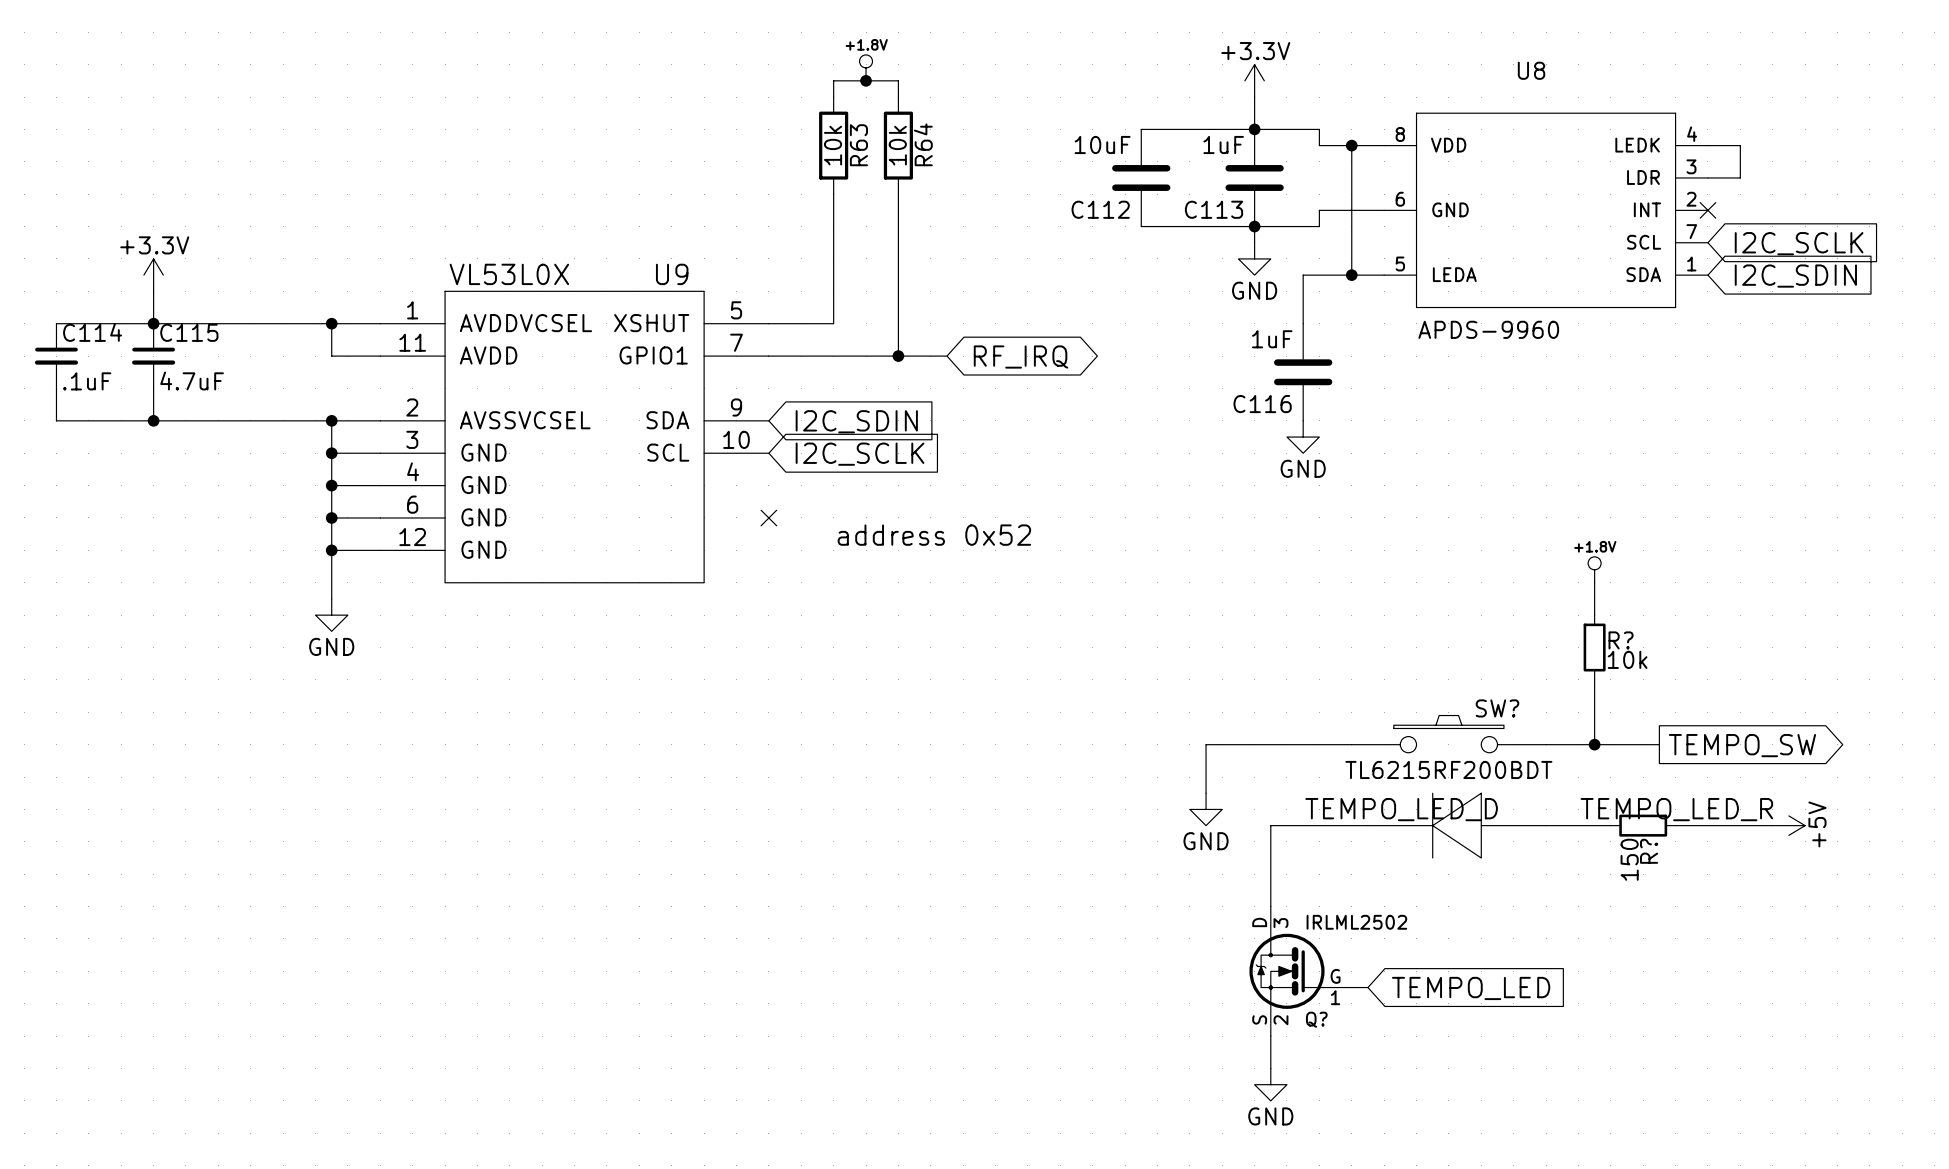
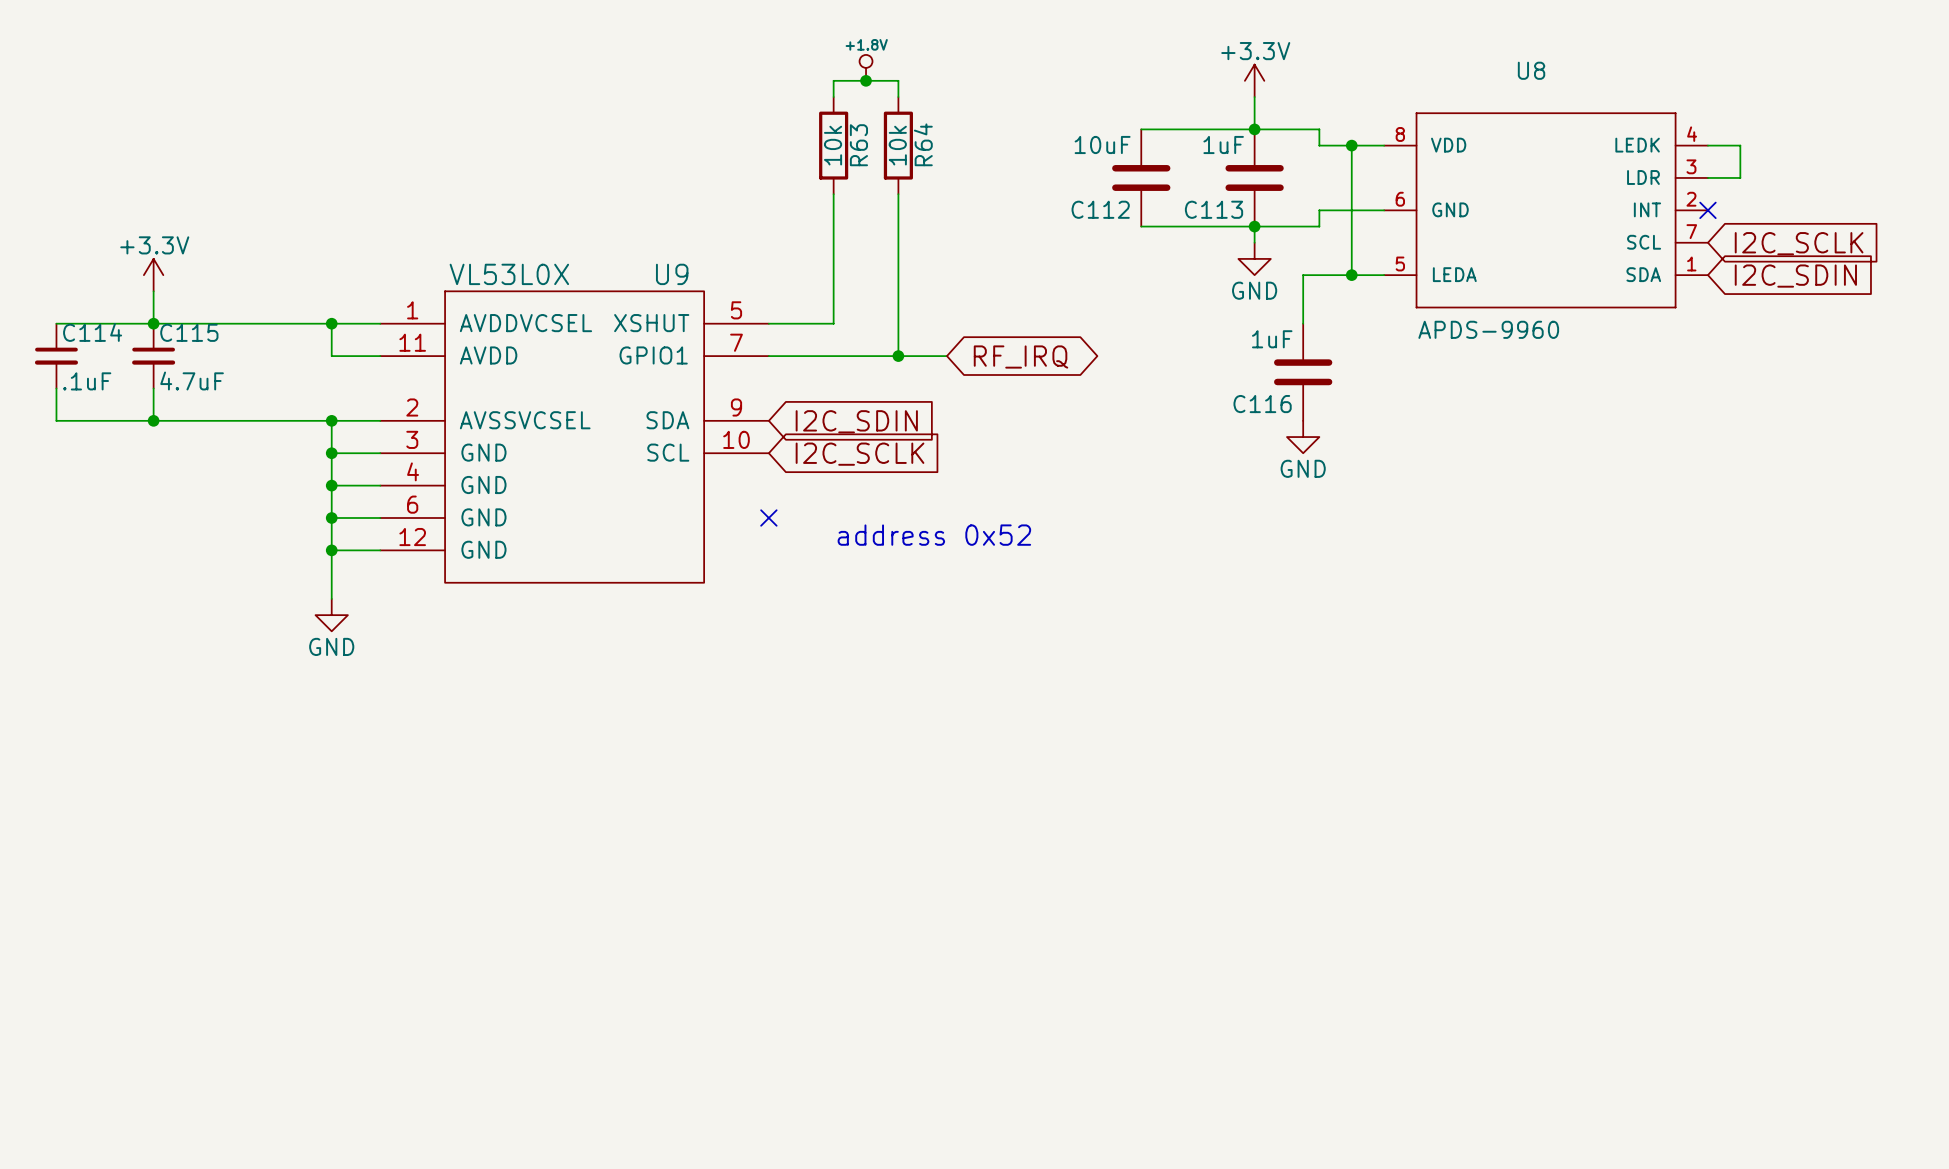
power symbol: +1.8V (1594, 569) -> none
wire: (1594, 582) (1594, 615) -> none
R?: 10k (1594, 647) -> none
wire: (1594, 679) (1594, 744) -> none
wire: (1351, 744) (1206, 744) (1206, 793) -> none
wire: (1546, 744) (1659, 744) -> none
junction: (1594, 744) -> none
global label: TEMPO_SW (1742, 745) -> none
SW?: TL6215RF200BDT (1448, 786) -> none
power symbol: GND (1206, 809) -> none
label: TEMPO_LED_D (1401, 809) -> none
label: TEMPO_LED_R (1676, 809) -> none
wire: (1367, 825) (1270, 825) (1270, 906) -> none
wire: (1546, 825) (1610, 825) -> none
R?: 150 (1643, 825) -> none
wire: (1675, 825) (1772, 825) -> none
power symbol: +5V (1788, 825) -> none
Q?: IRLML2502 (1308, 971) -> none
global label: TEMPO_LED (1471, 988) -> none
wire: (1270, 1036) (1270, 1068) -> none
power symbol: GND (1270, 1084) -> none

